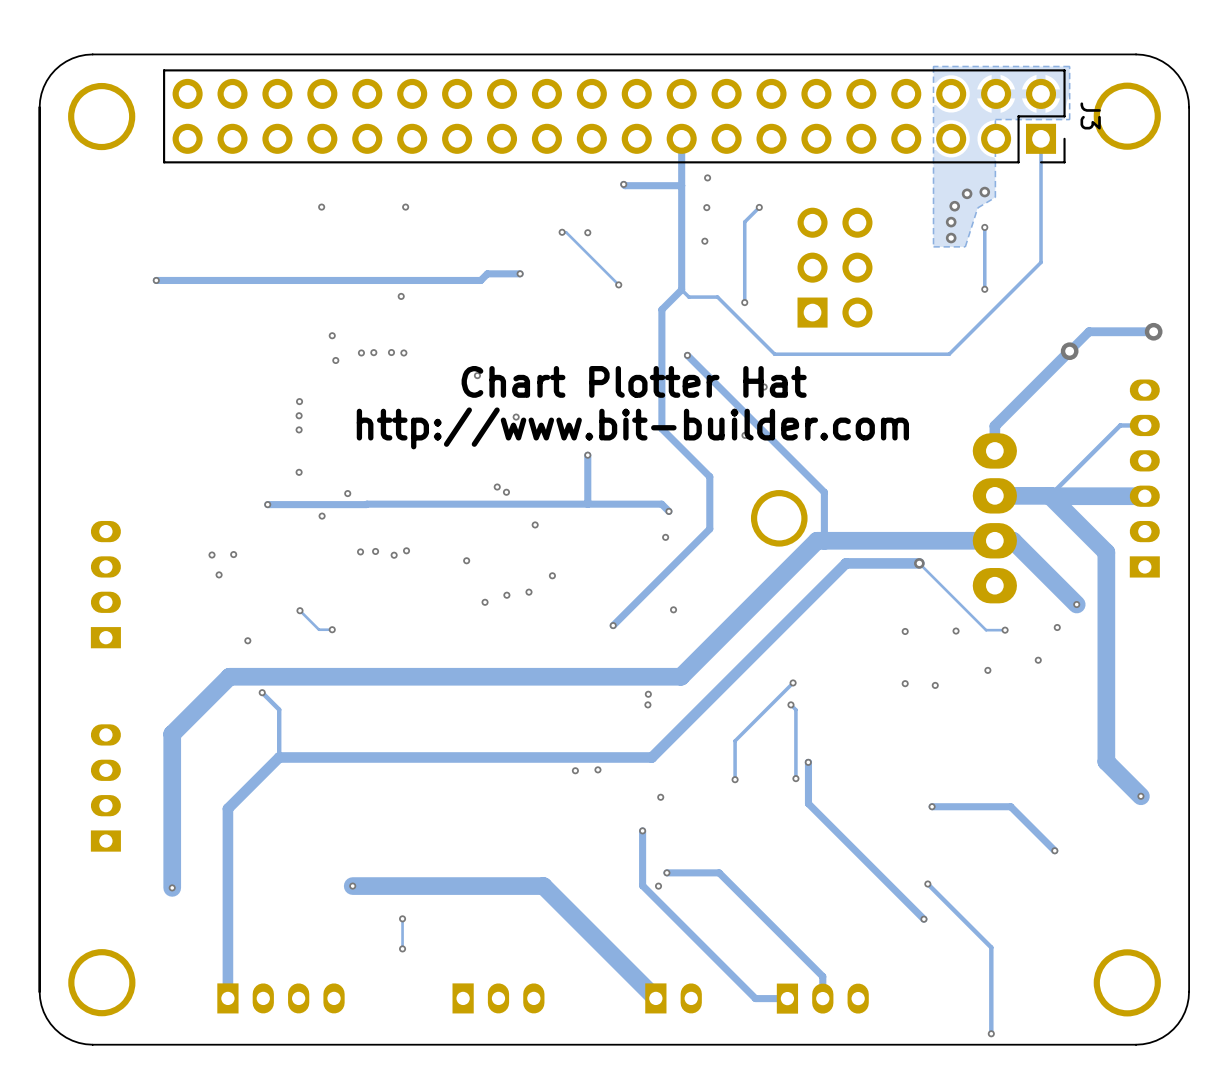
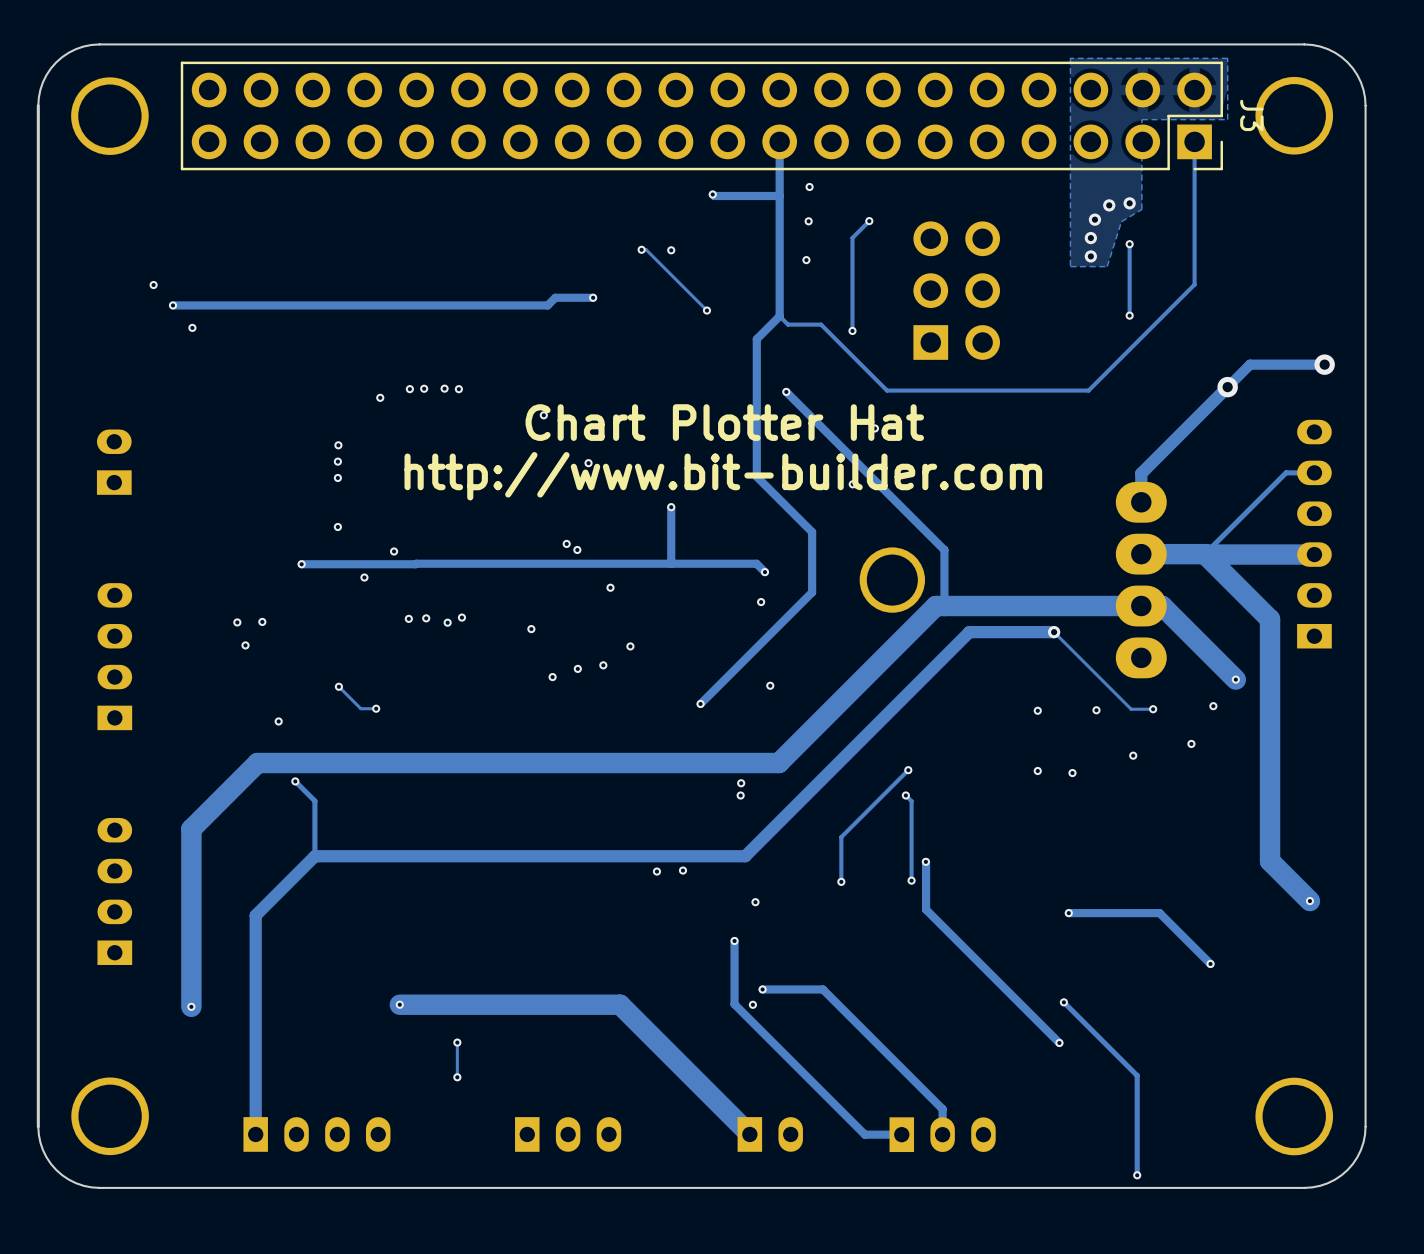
via: (321, 207) -> none
via: (405, 207) -> none
via: none -> (153, 285)
via: (401, 296) -> none
via: none -> (192, 327)
via: (332, 335) -> none
part: none -> (114, 462)

